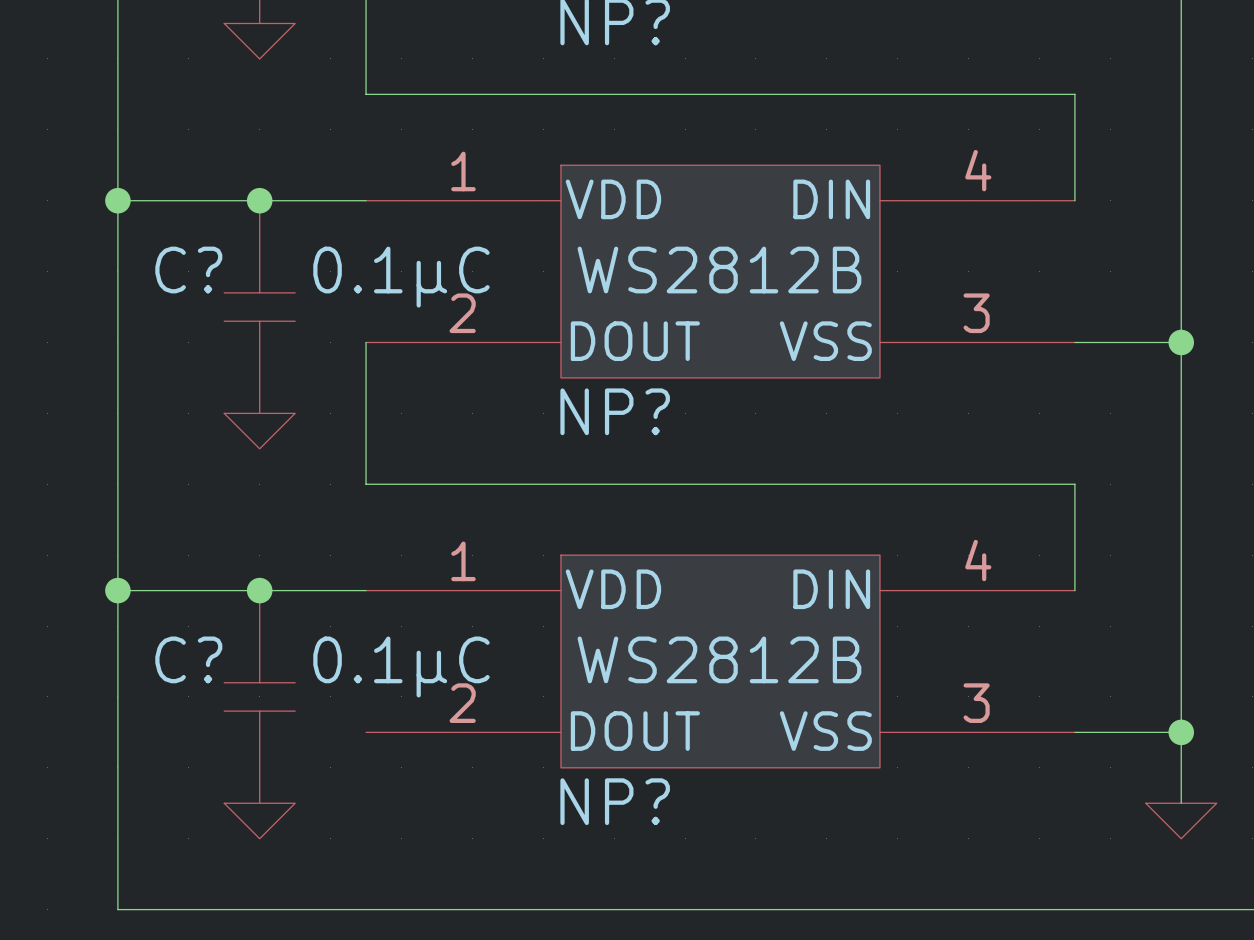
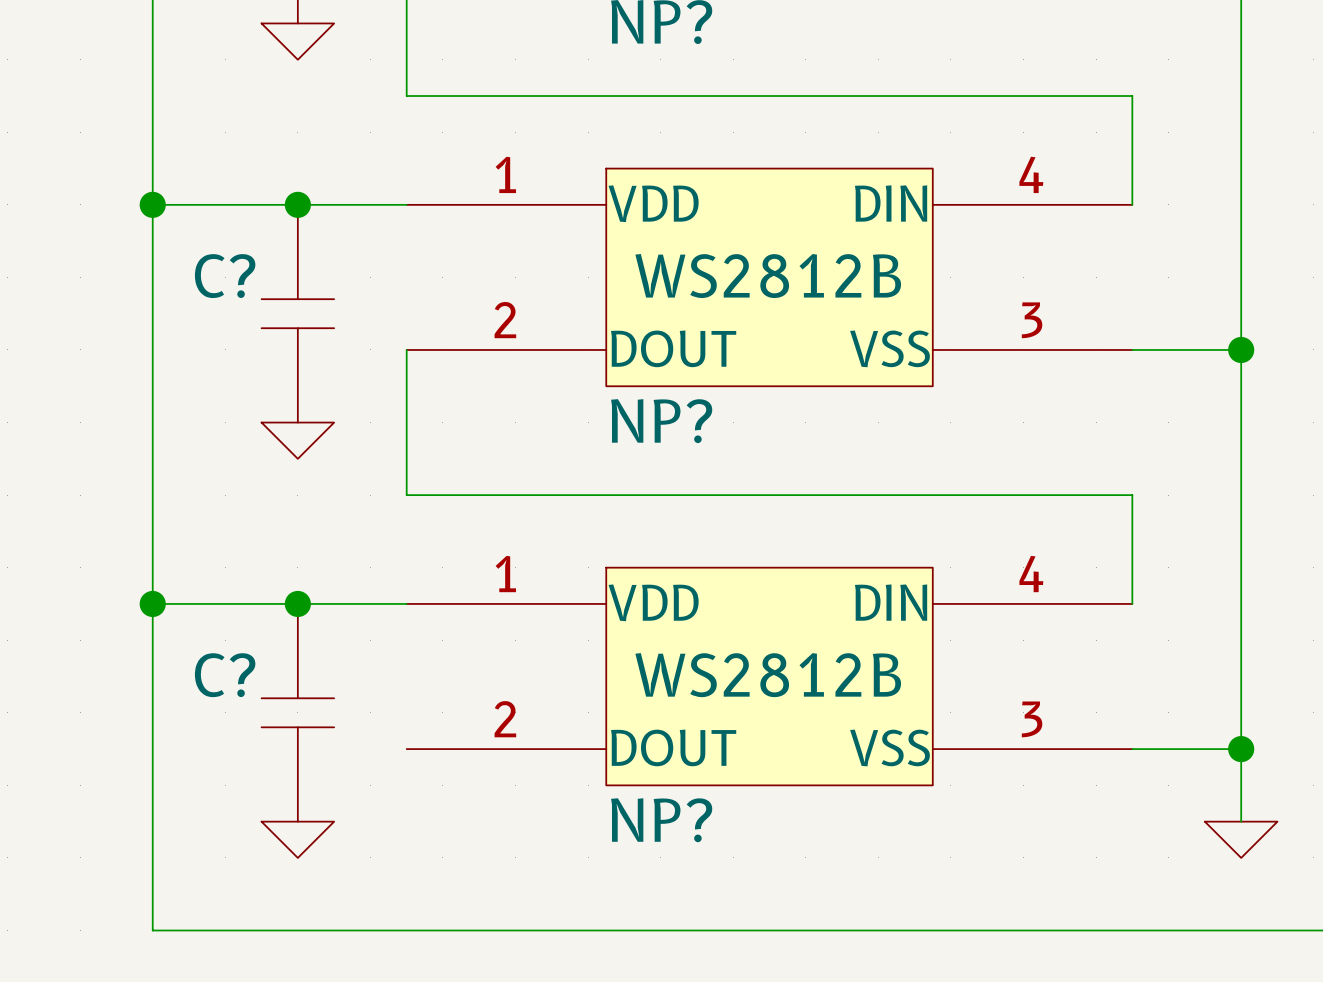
C? text: 0.1µC (401, 277) -> none
C? text: 0.1µC (401, 666) -> none

